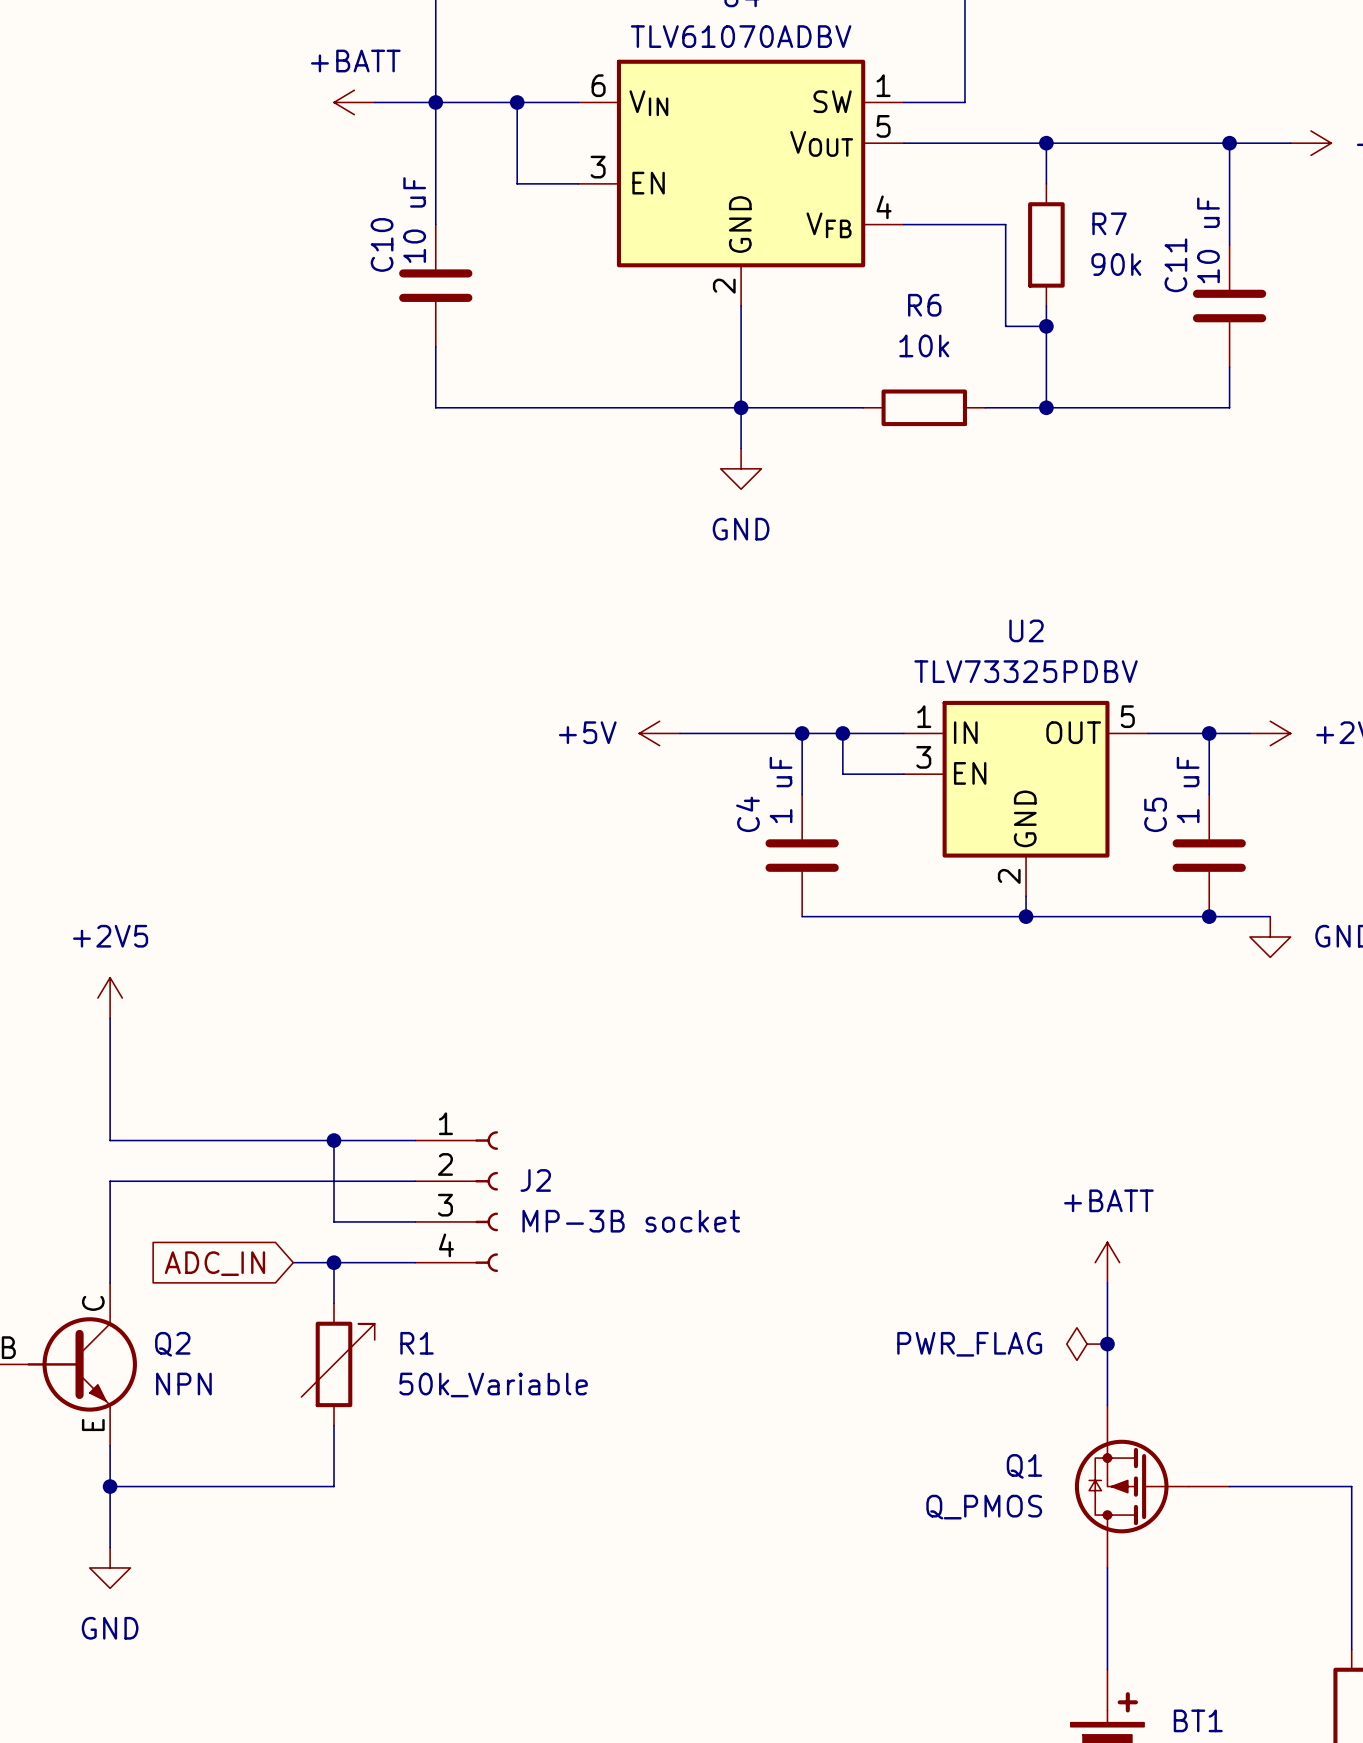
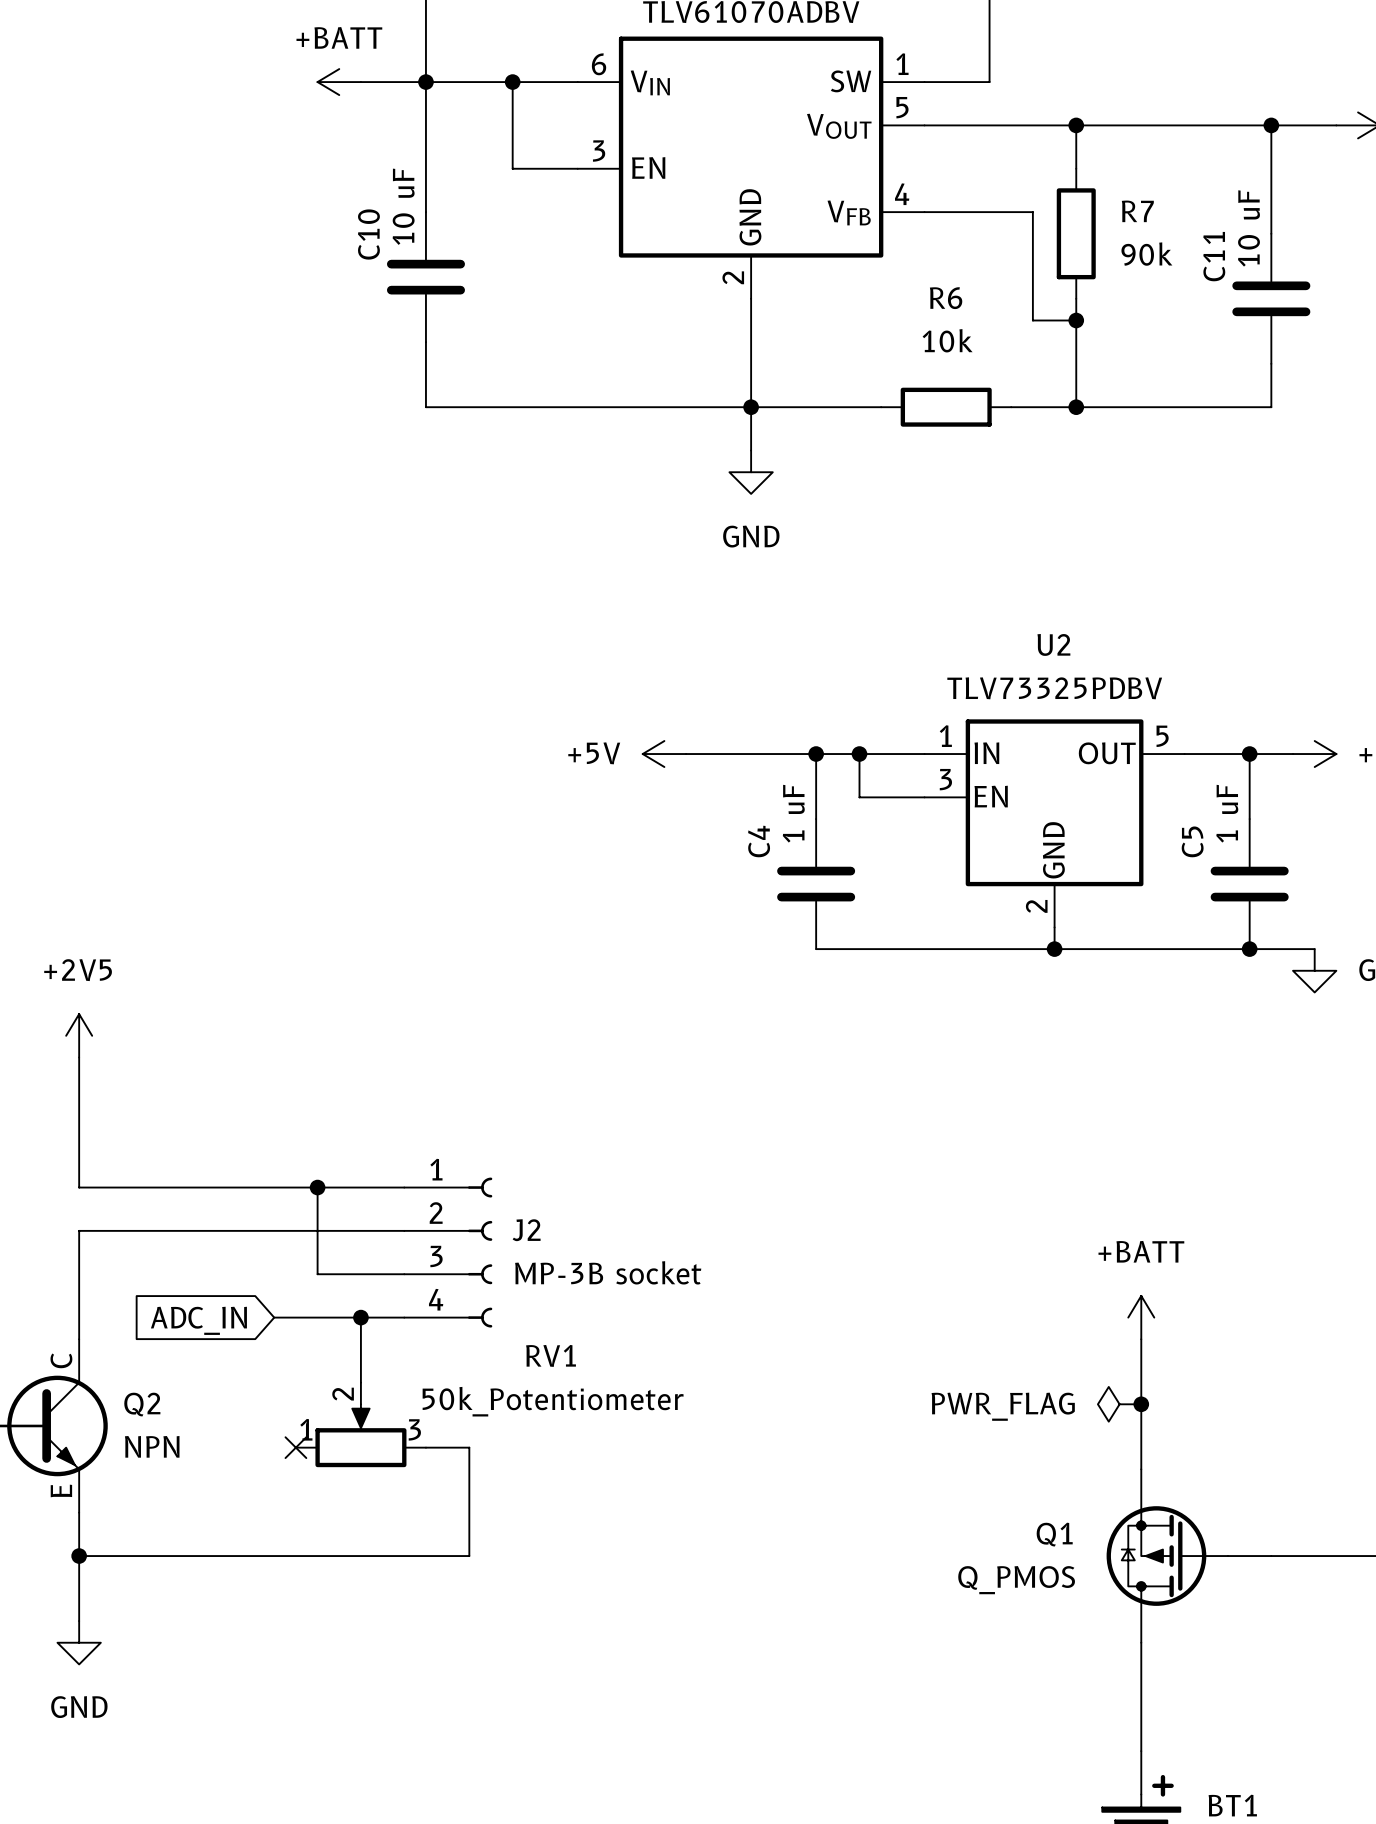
wire: (333, 1262) (333, 1303) -> none
junction position: (333, 1262) -> (360, 1317)
wire: none -> (360, 1317) (360, 1382)
RV1: none -> 50k_Potentiometer (360, 1424)
R1: 50k_Variable (338, 1364) -> none
no-connect mark: none -> (295, 1447)
wire: (333, 1425) (333, 1486) -> (425, 1447) (469, 1447) (469, 1556) (317, 1556)

